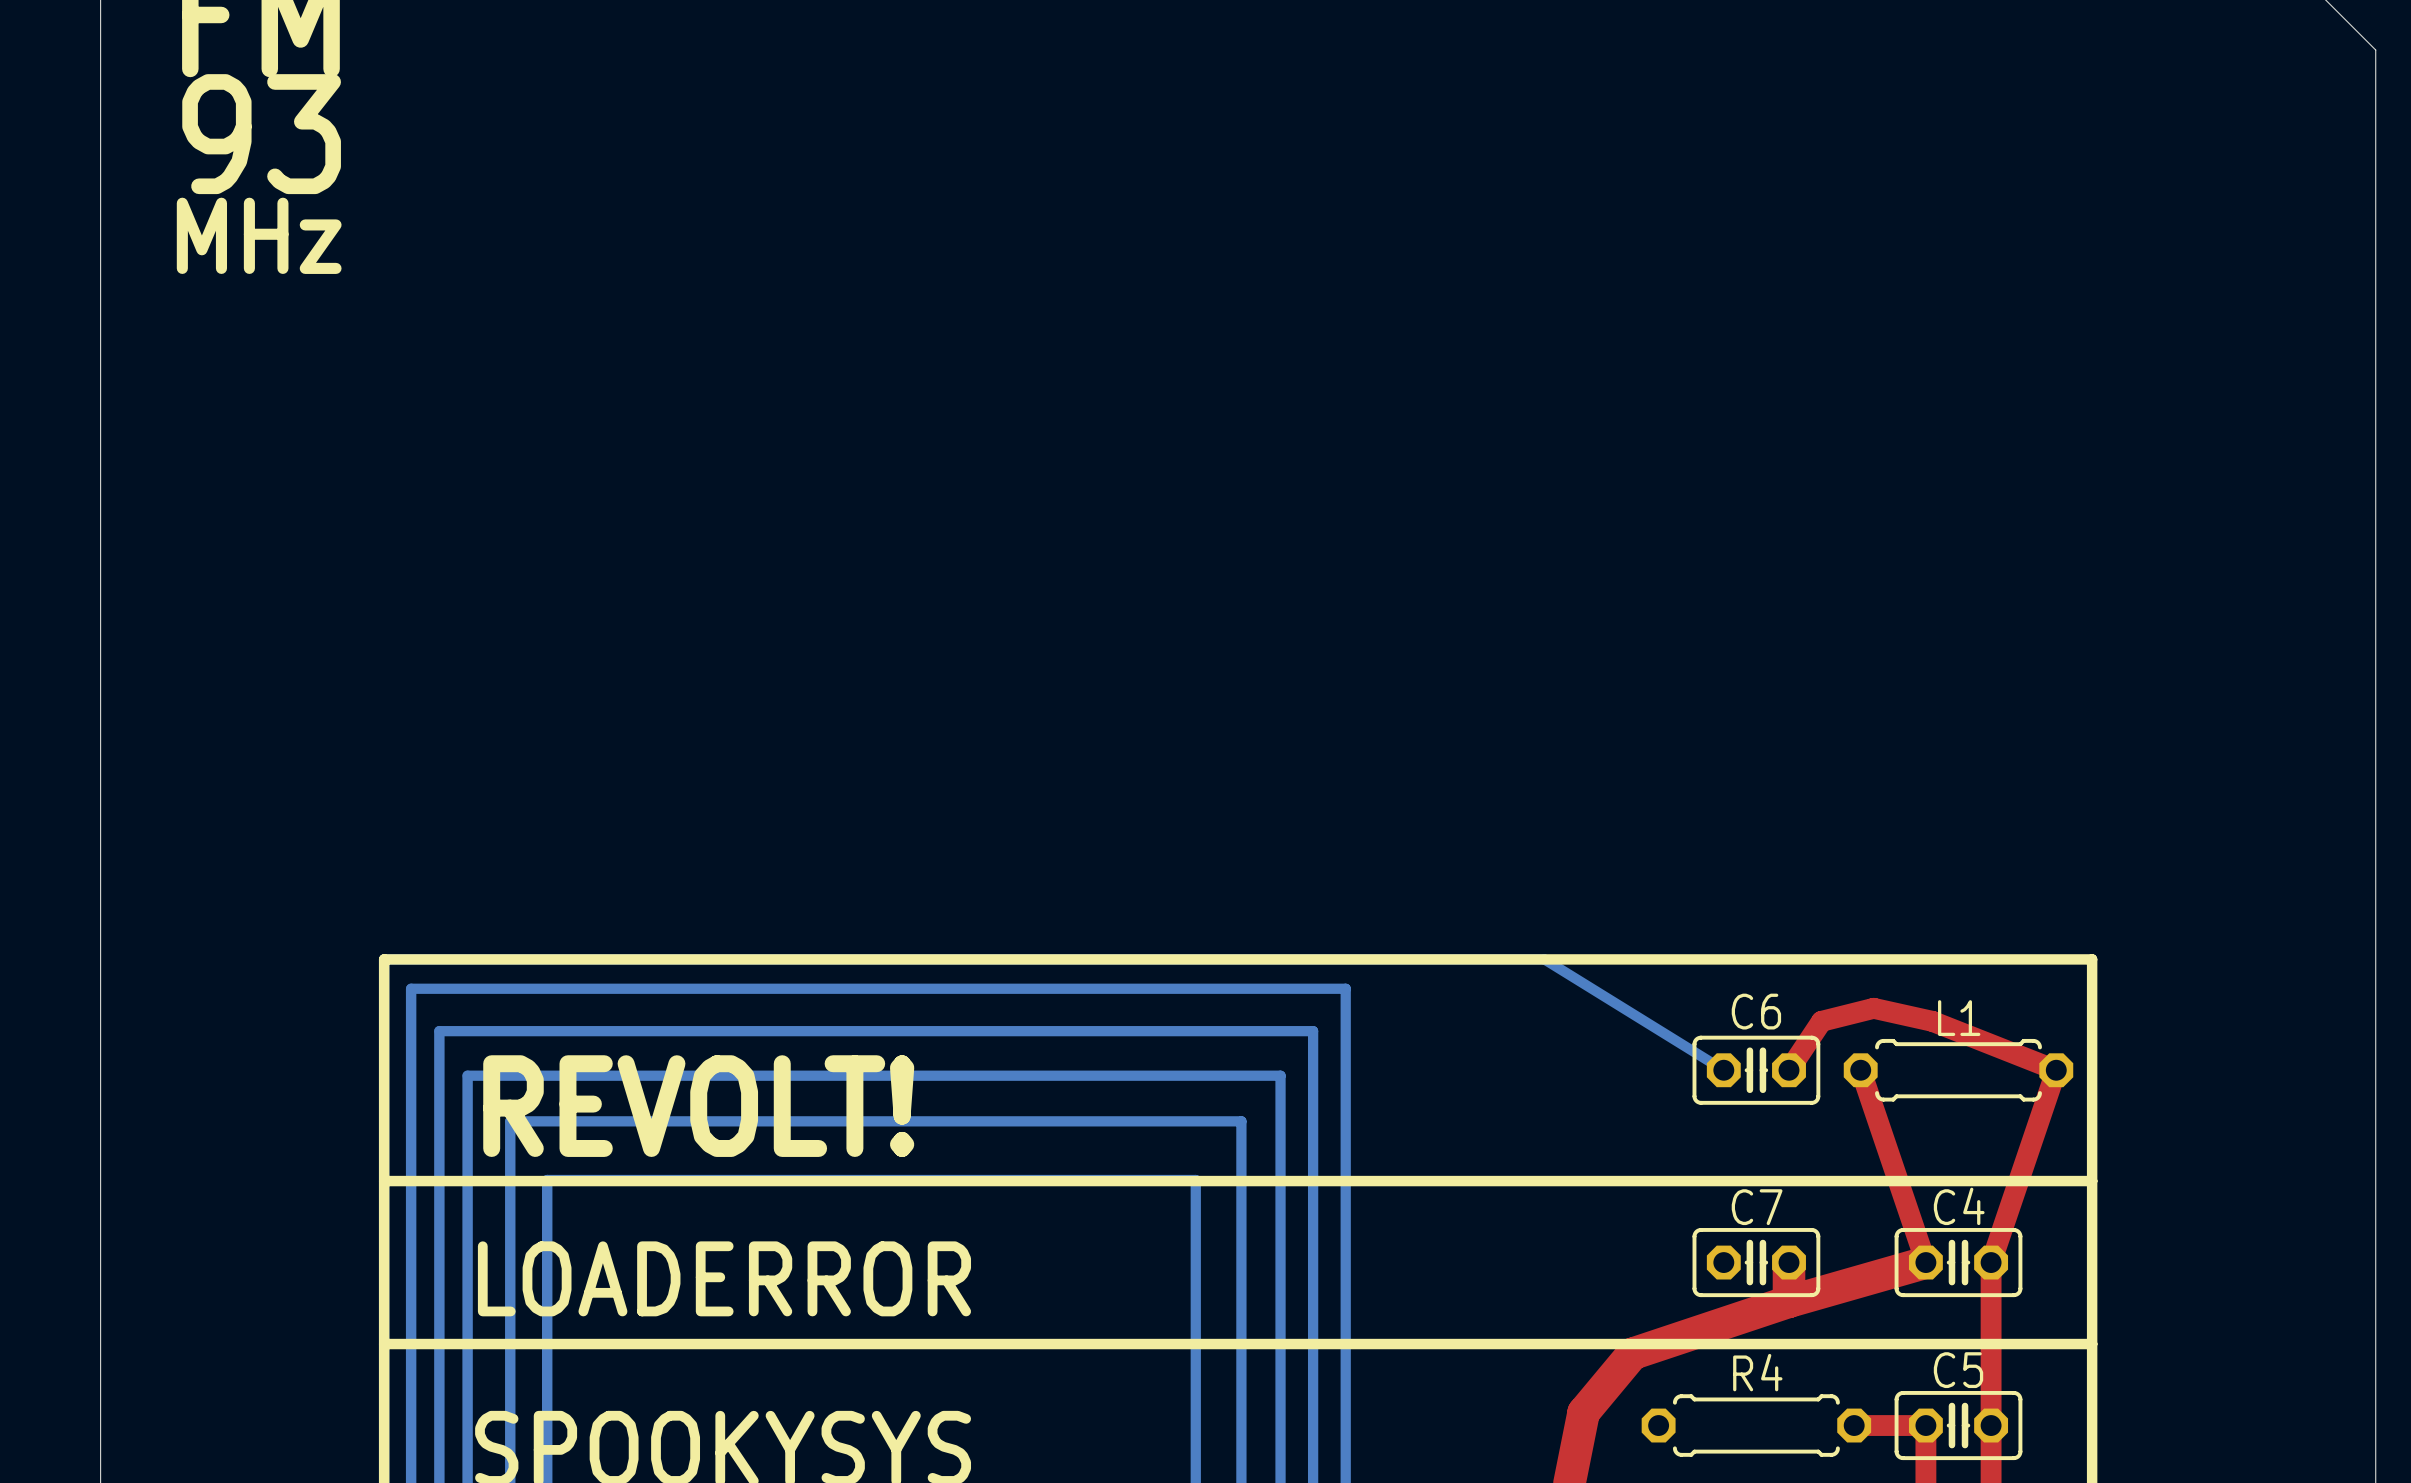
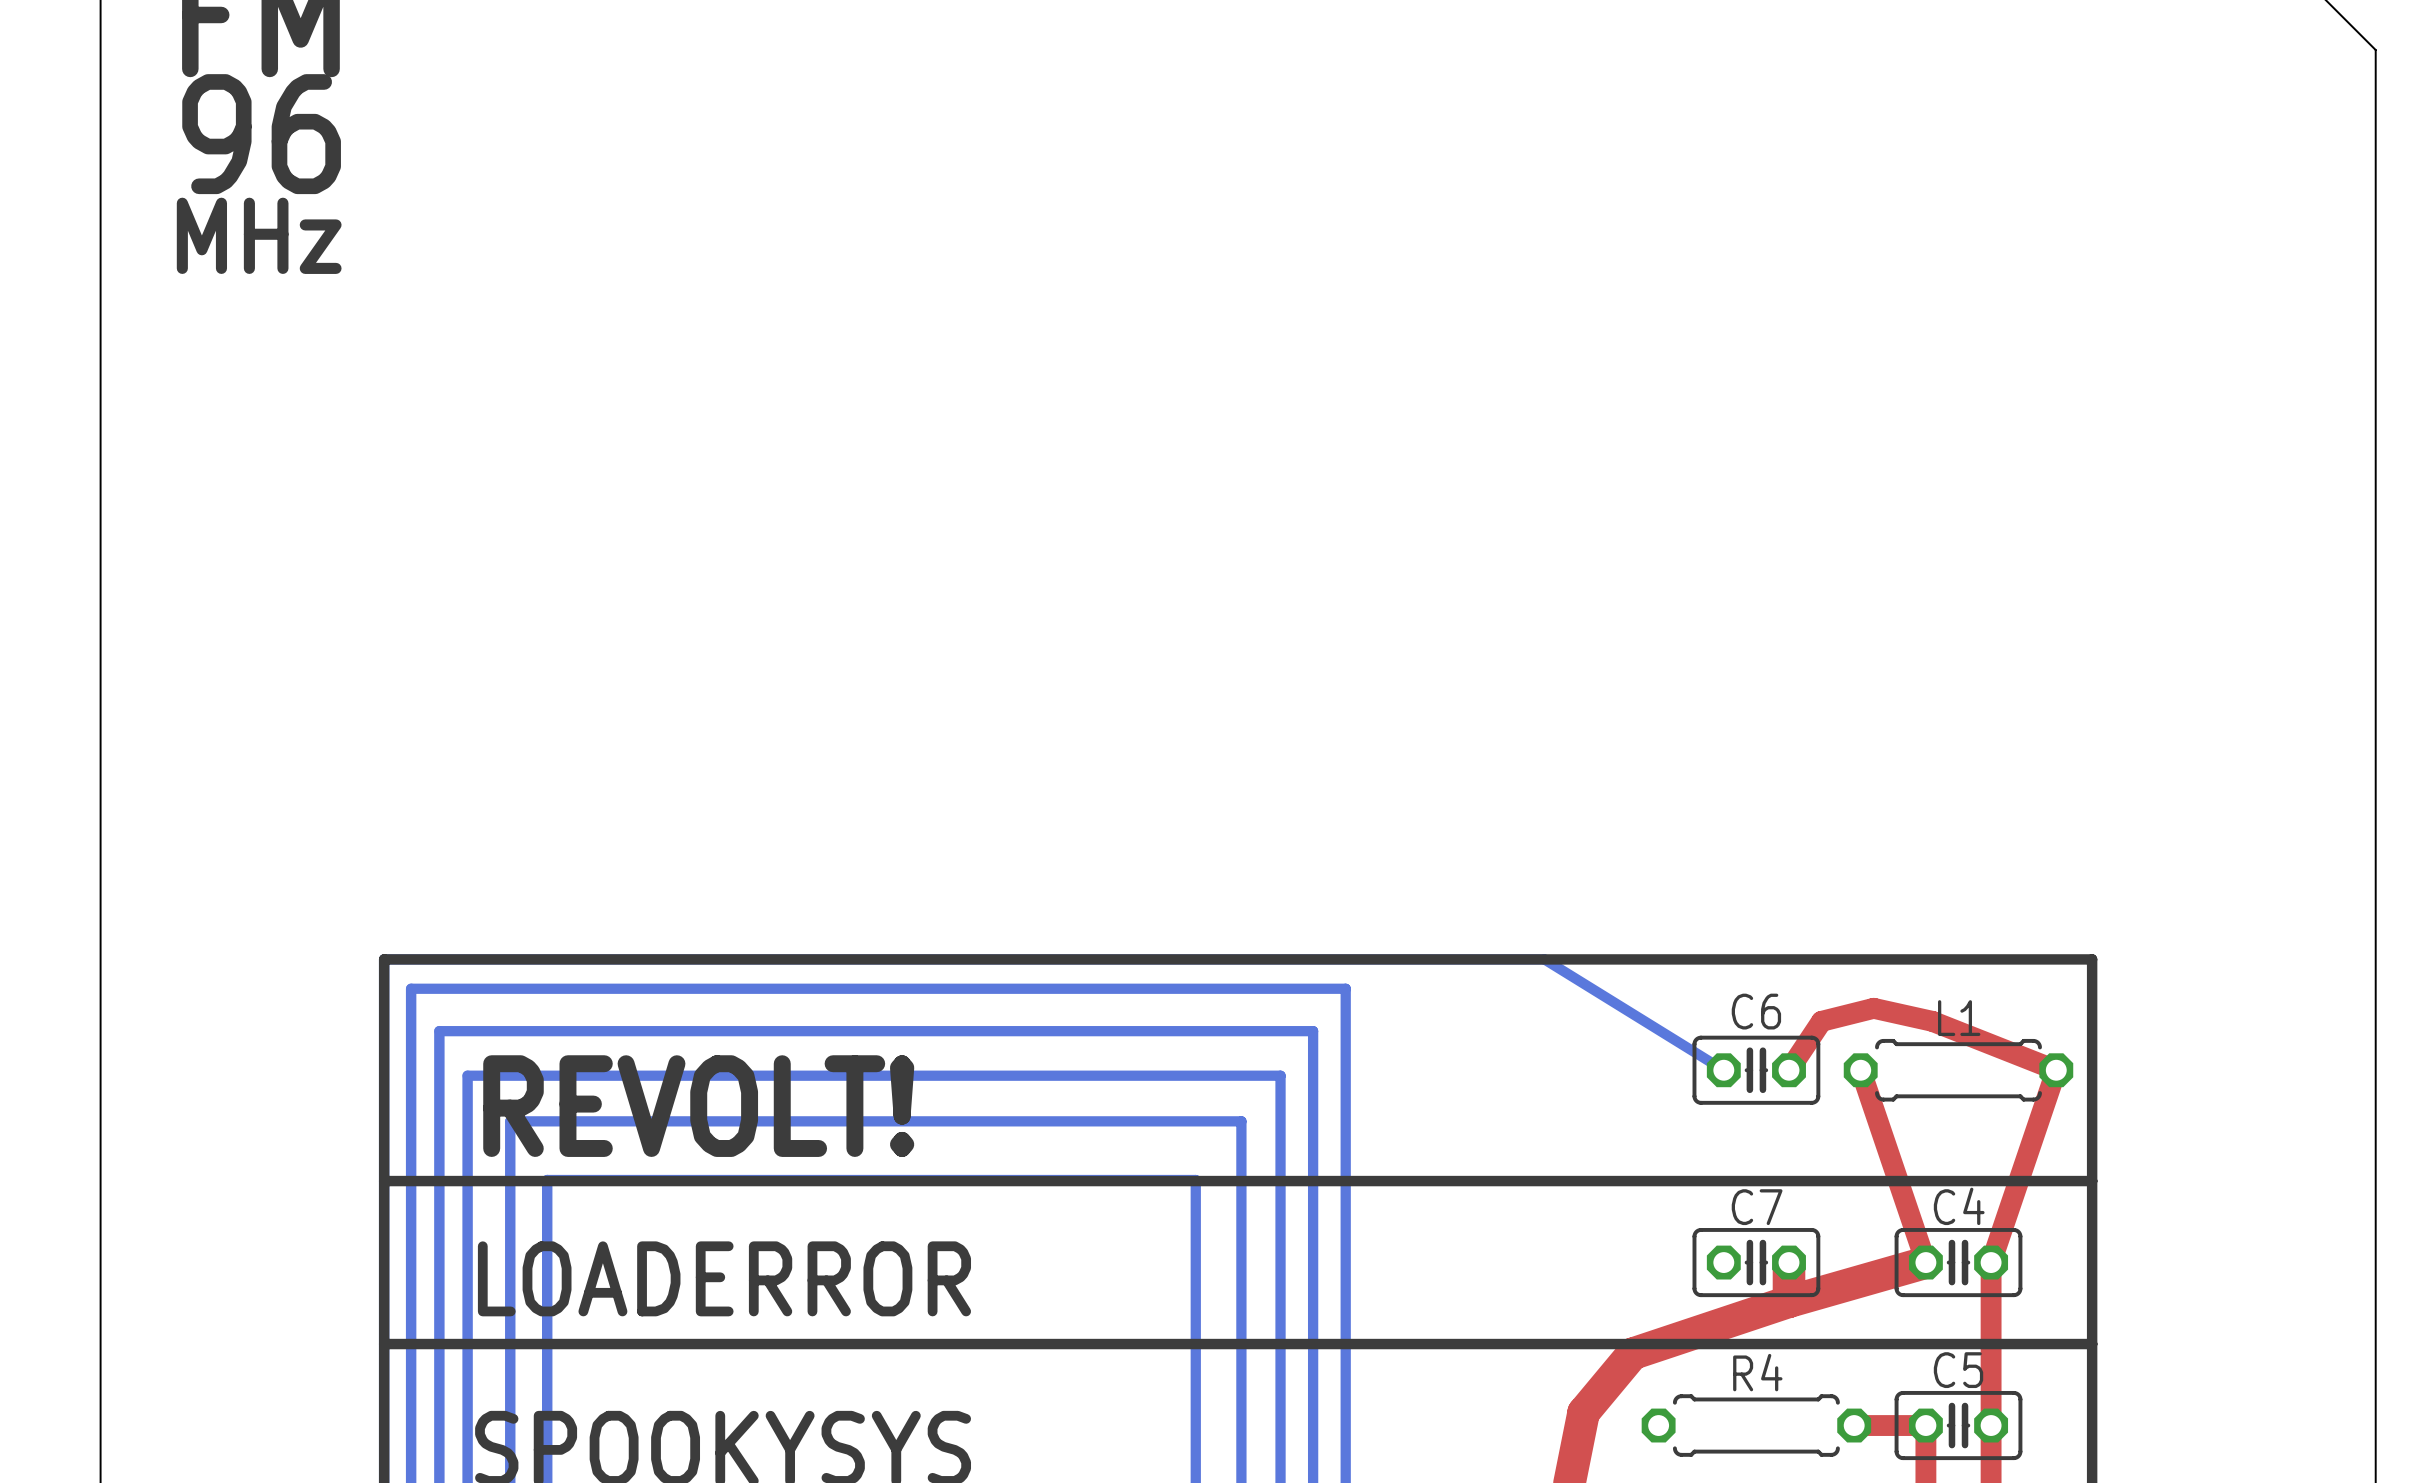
text: 93 (261, 134) -> 96 (261, 134)

